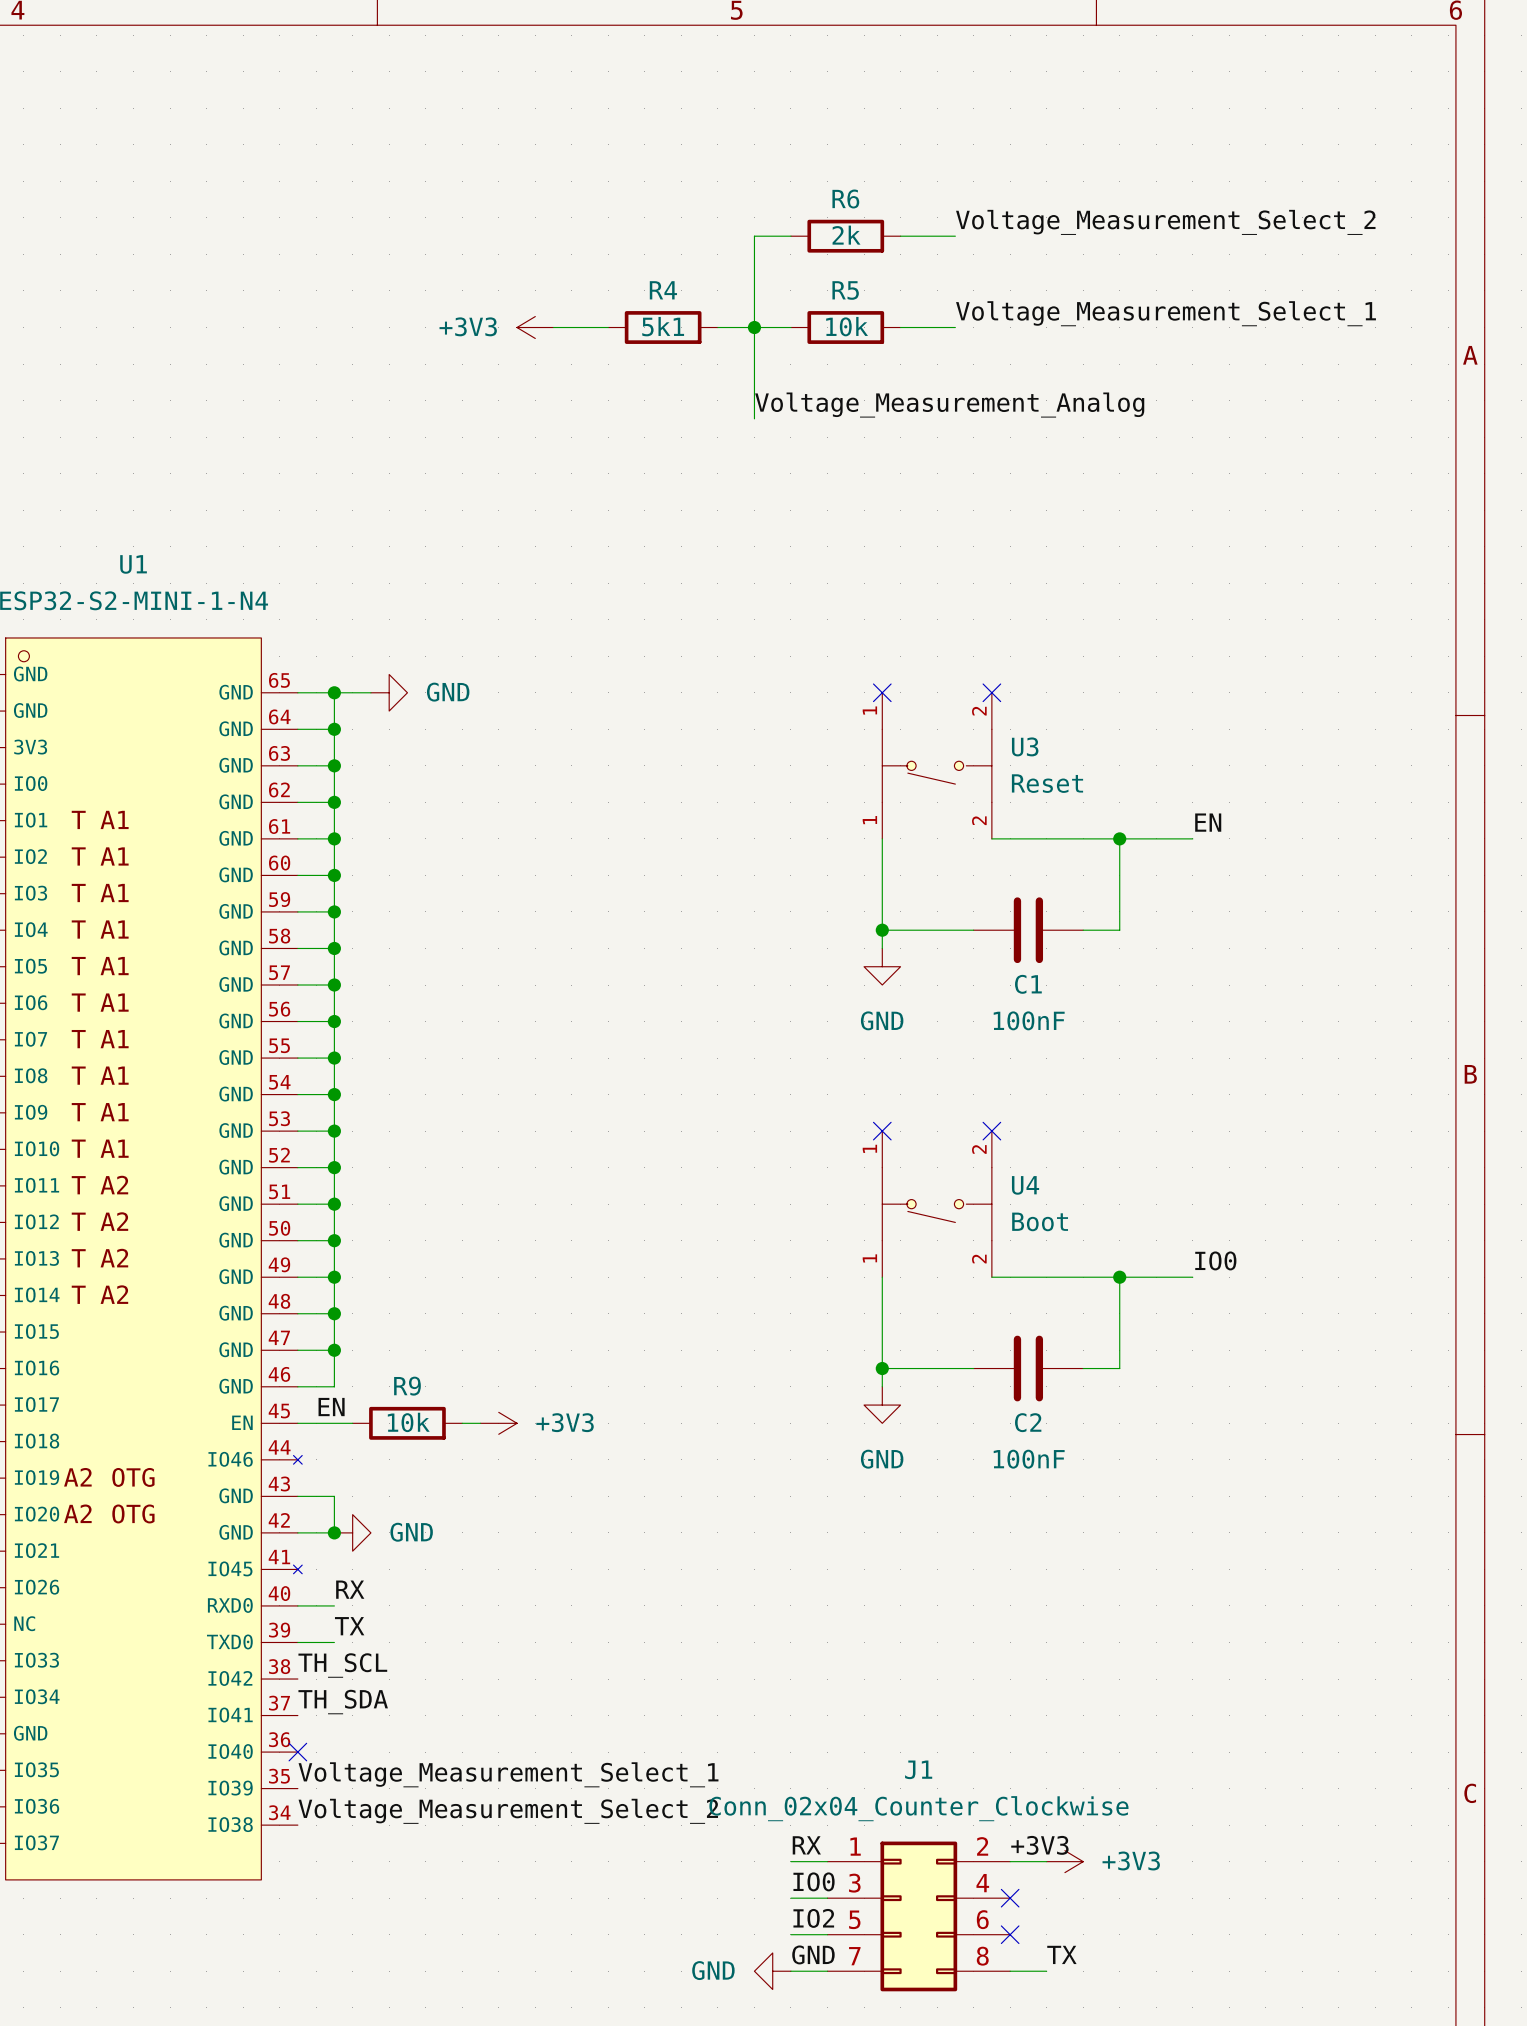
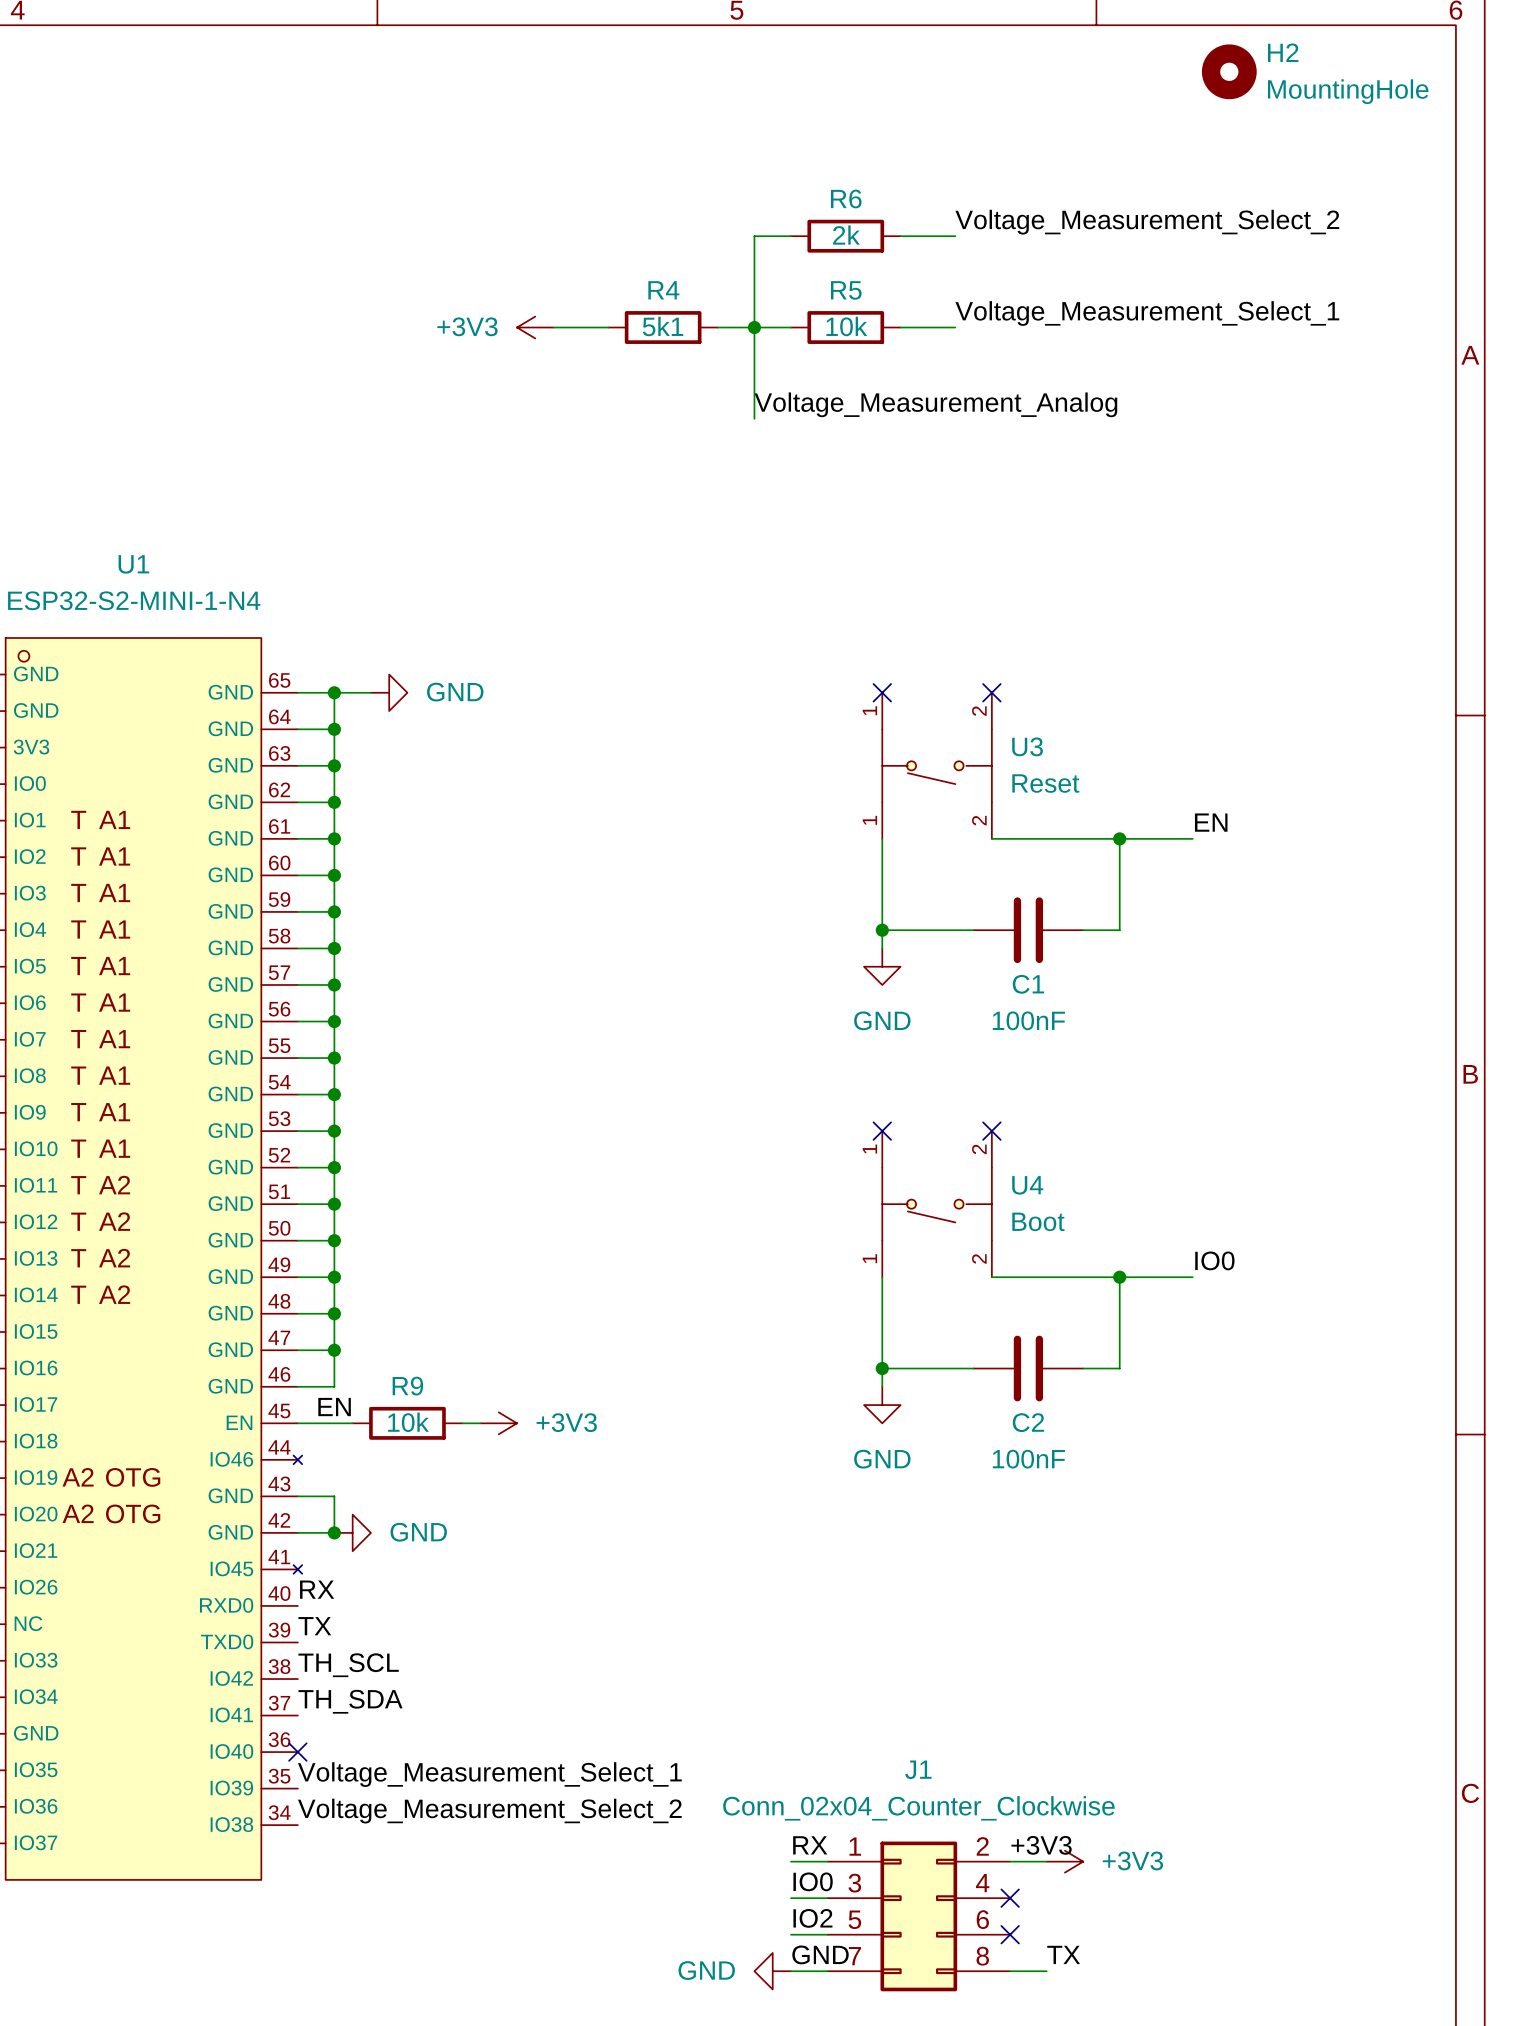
H2: none -> MountingHole (1229, 71)
label position: RX (350, 1589) -> RX (317, 1589)
wire: (297, 1605) (334, 1605) -> none
label position: TX (349, 1626) -> TX (314, 1626)
wire: (297, 1642) (334, 1642) -> none

